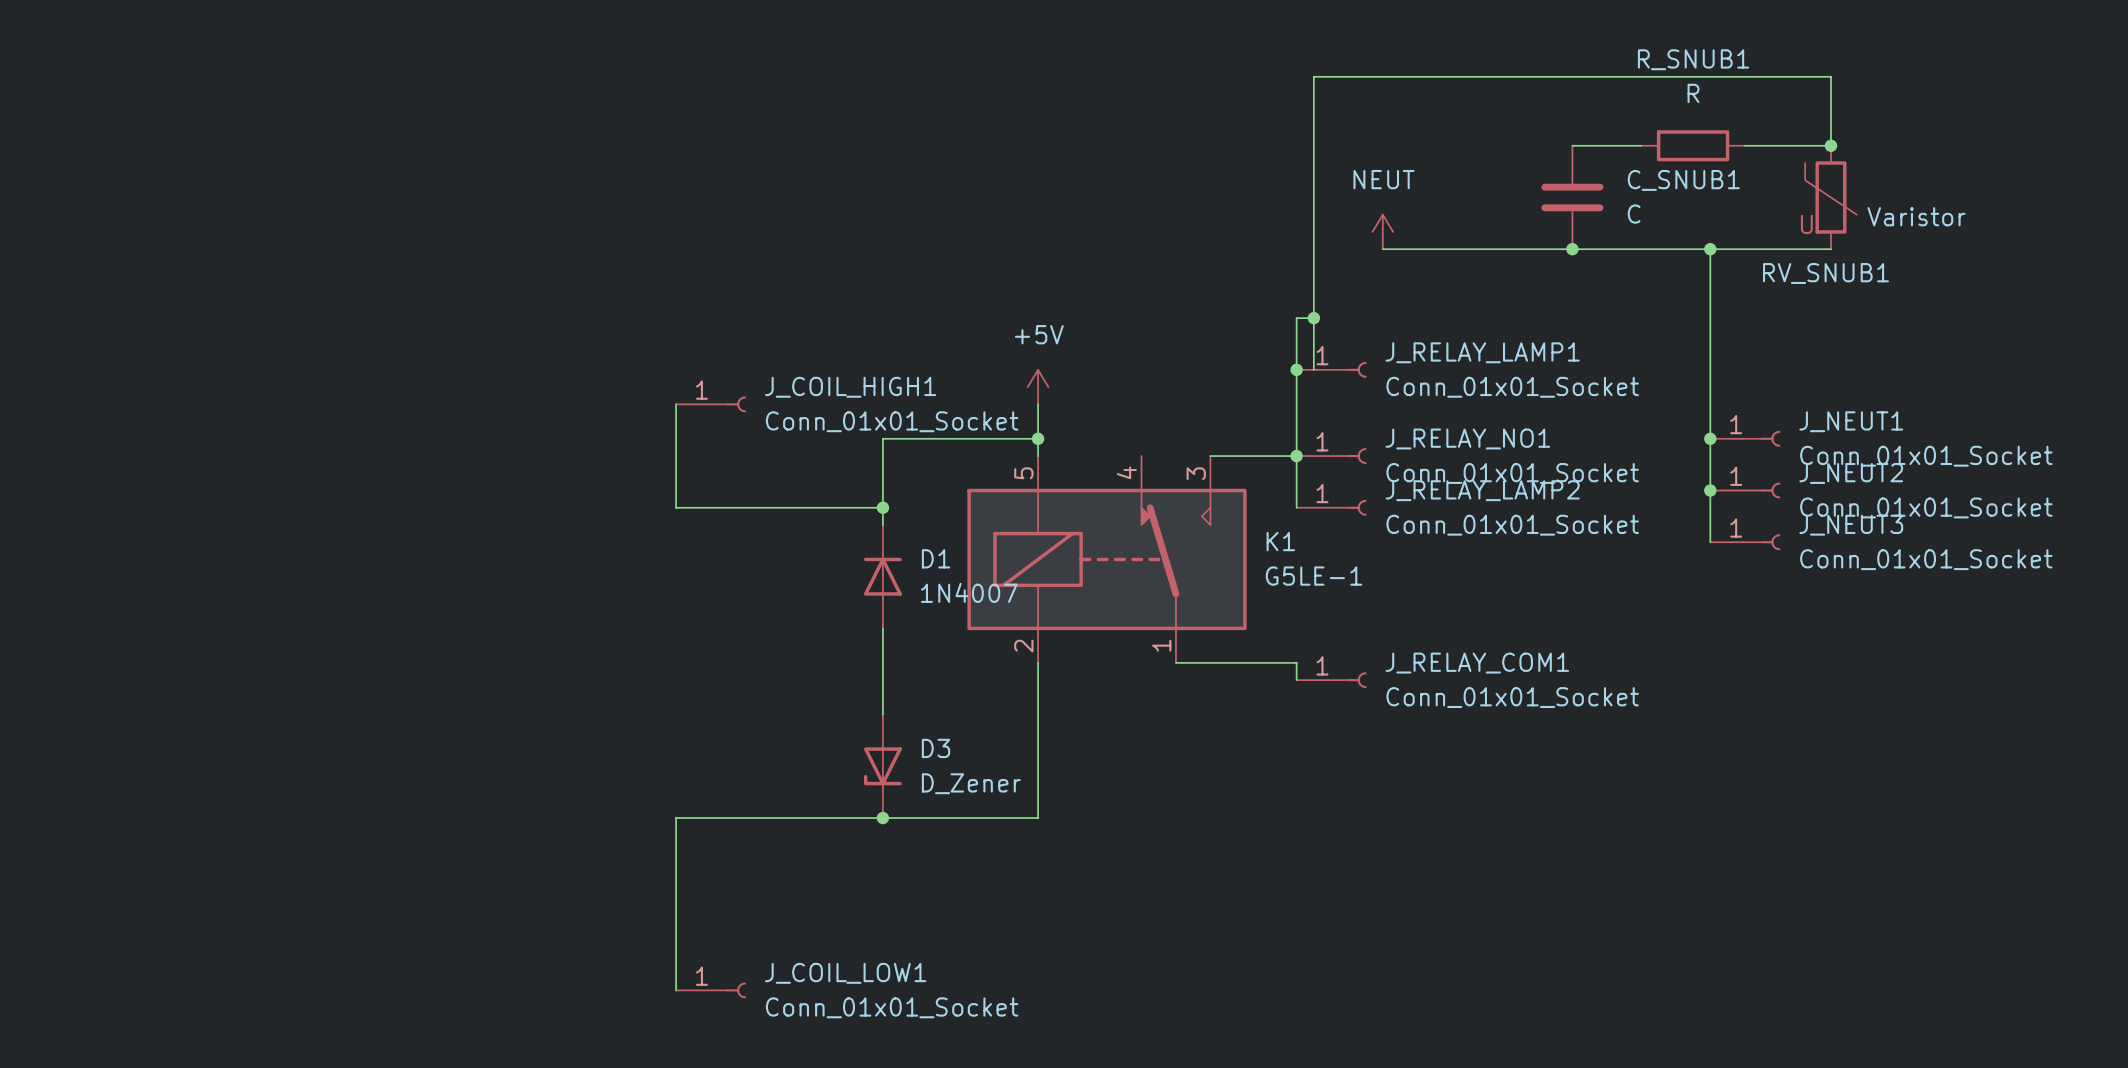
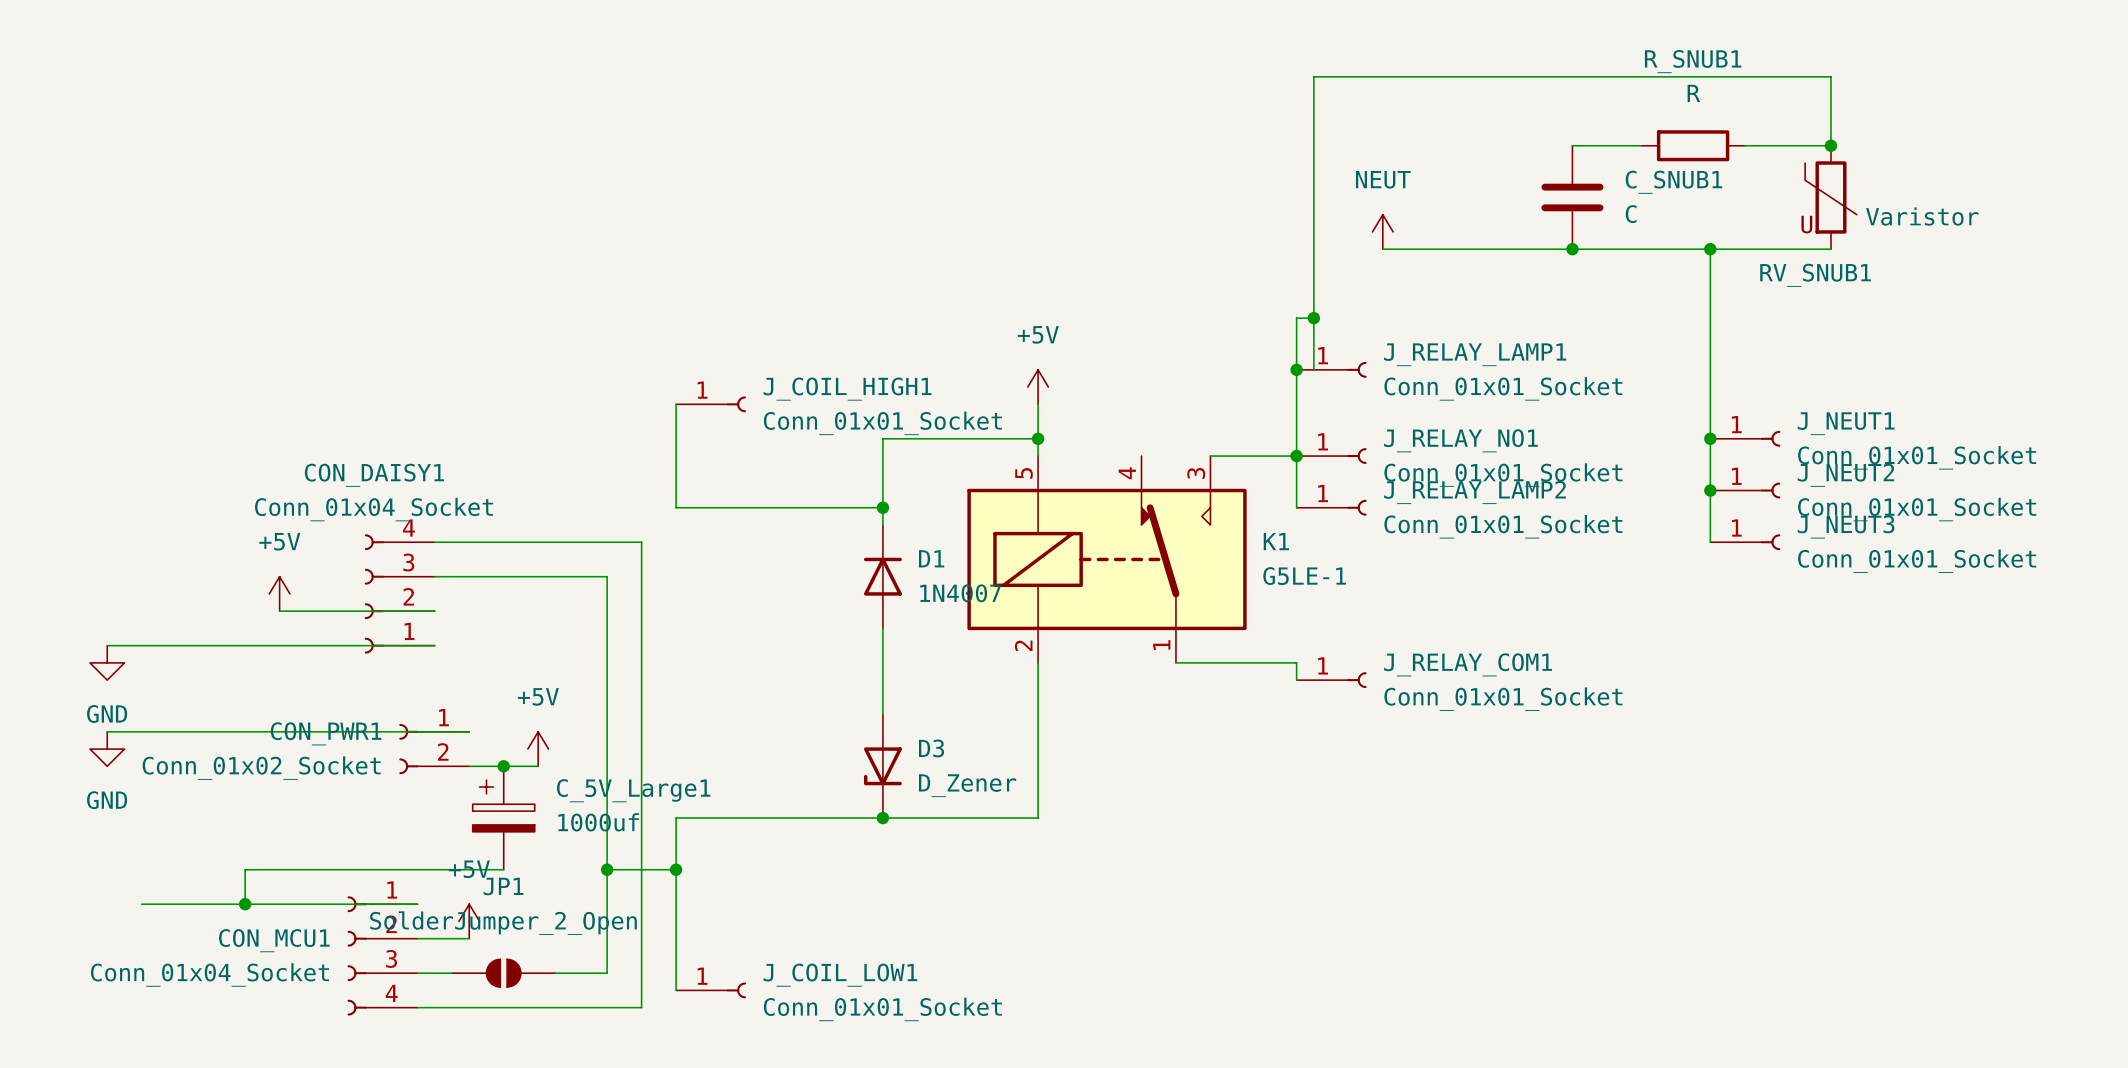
wire: none -> (434, 542) (641, 542) (641, 1007) (417, 1007)
wire: none -> (434, 576) (607, 576) (607, 973) (555, 973)
power symbol: none -> +5V (279, 593)
CON_DAISY1: none -> Conn_01x04_Socket (399, 593)
wire: none -> (279, 611) (434, 611)
wire: none -> (107, 645) (434, 645)
power symbol: none -> GND (107, 662)
wire: none -> (107, 731) (469, 731)
power symbol: none -> GND (107, 749)
CON_PWR1: none -> Conn_01x02_Socket (434, 749)
power symbol: none -> +5V (538, 749)
wire: none -> (469, 766) (538, 766)
junction: none -> (503, 766)
C_5V_Large1: none -> 1000uf (503, 818)
wire: none -> (503, 869) (245, 869) (245, 904)
wire: none -> (607, 869) (676, 869)
junction: none -> (607, 869)
junction: none -> (676, 869)
wire: none -> (141, 904) (417, 904)
junction: none -> (245, 904)
power symbol: none -> +5V (469, 921)
wire: none -> (417, 938) (469, 938)
CON_MCU1: none -> Conn_01x04_Socket (382, 955)
wire: none -> (417, 973) (451, 973)
JP1: none -> SolderJumper_2_Open (503, 973)

